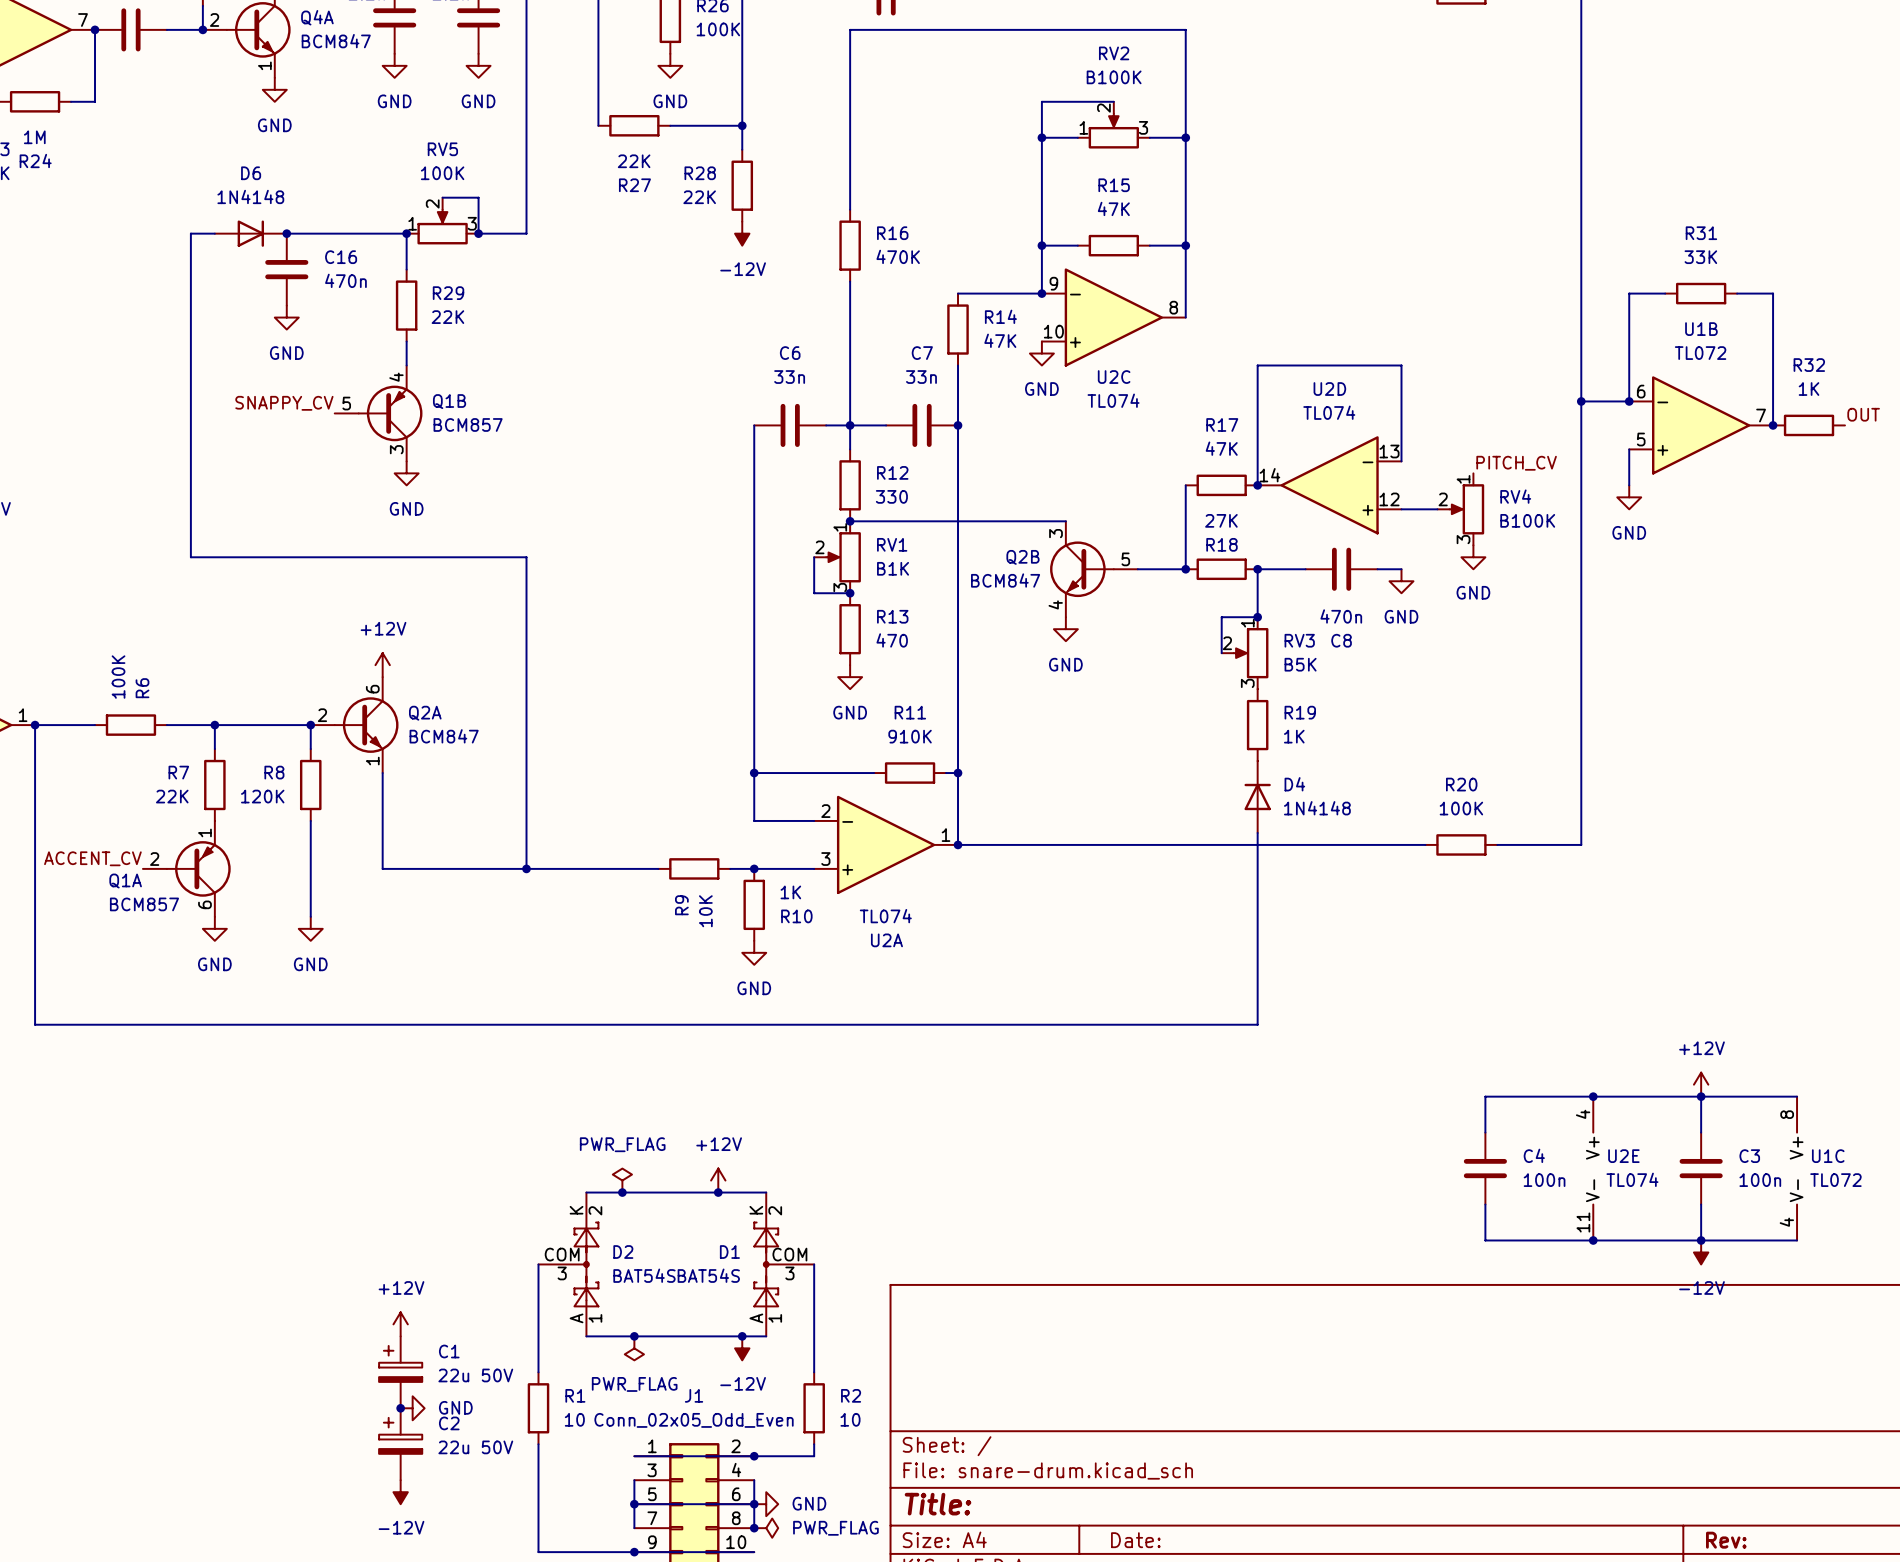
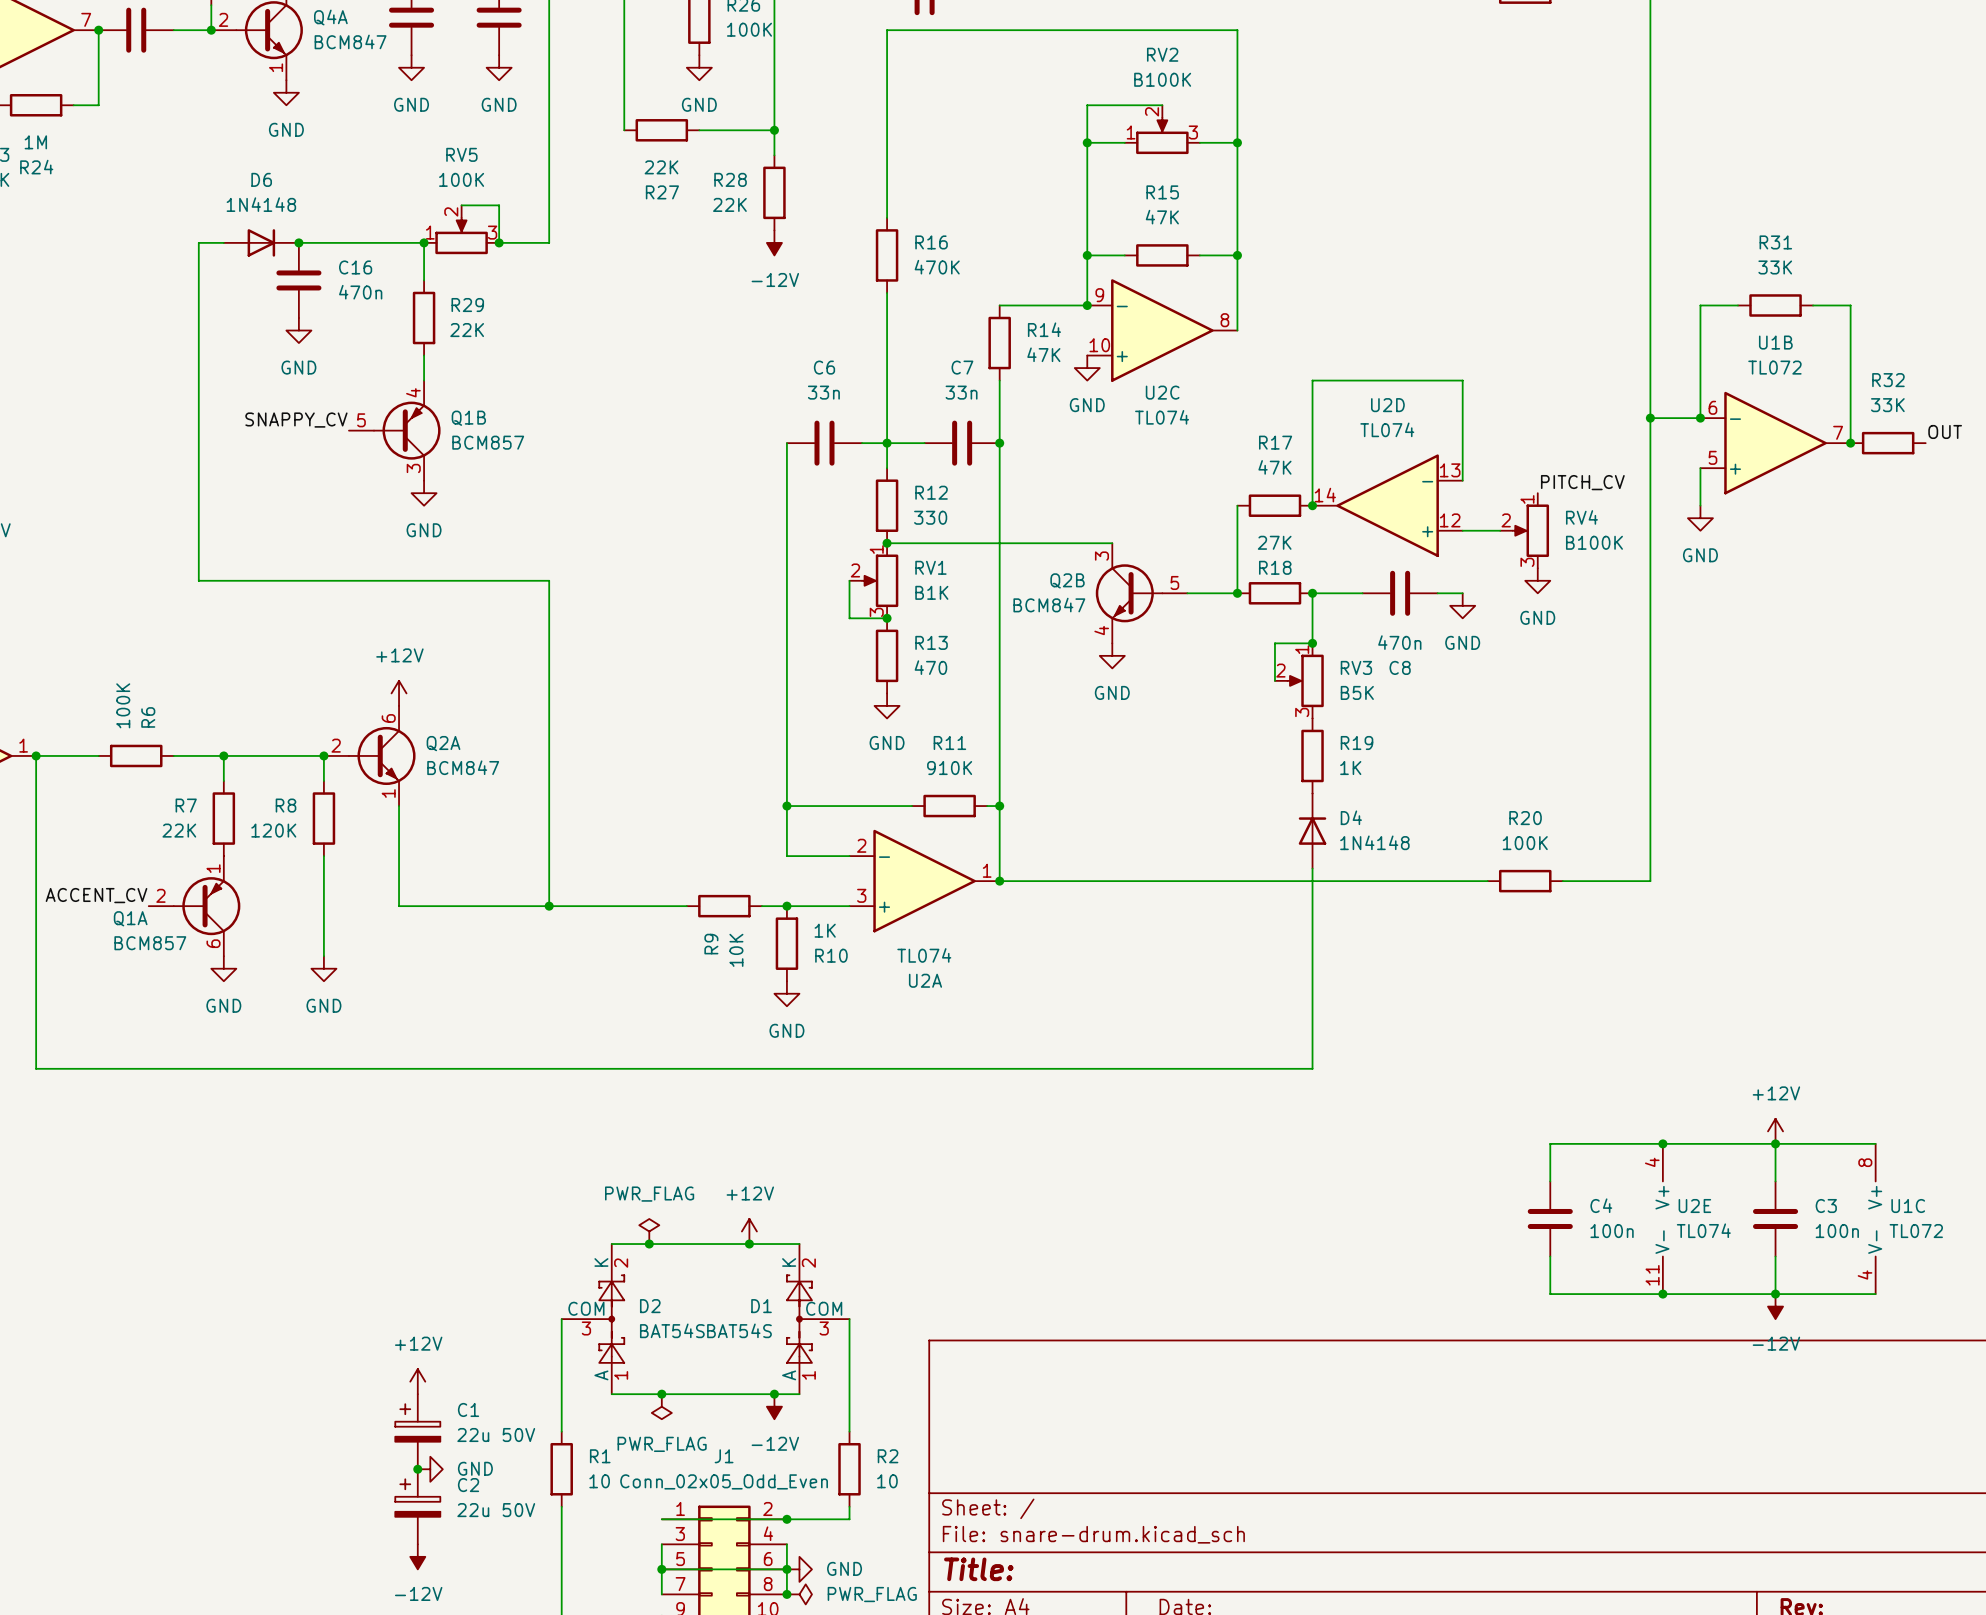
R32 value: 1K (1809, 389) -> 33K (1887, 405)

